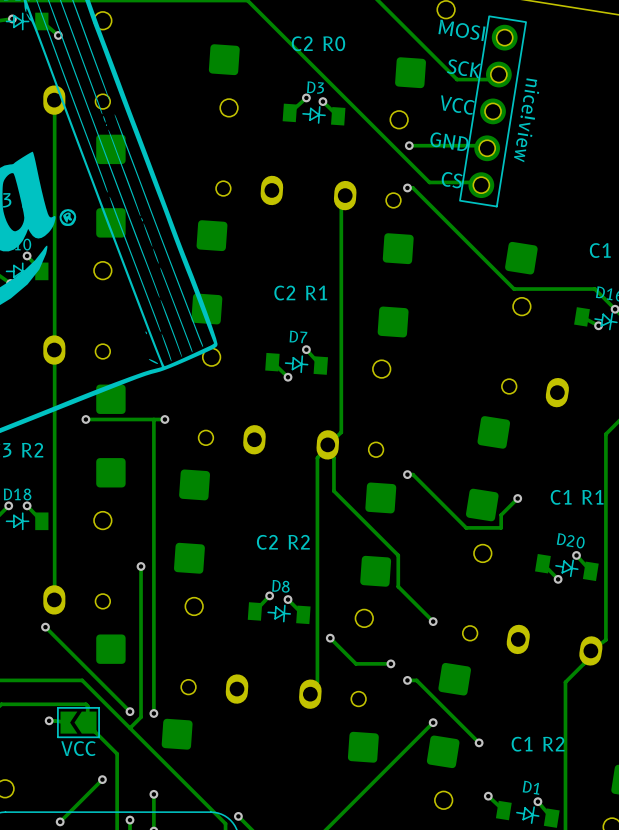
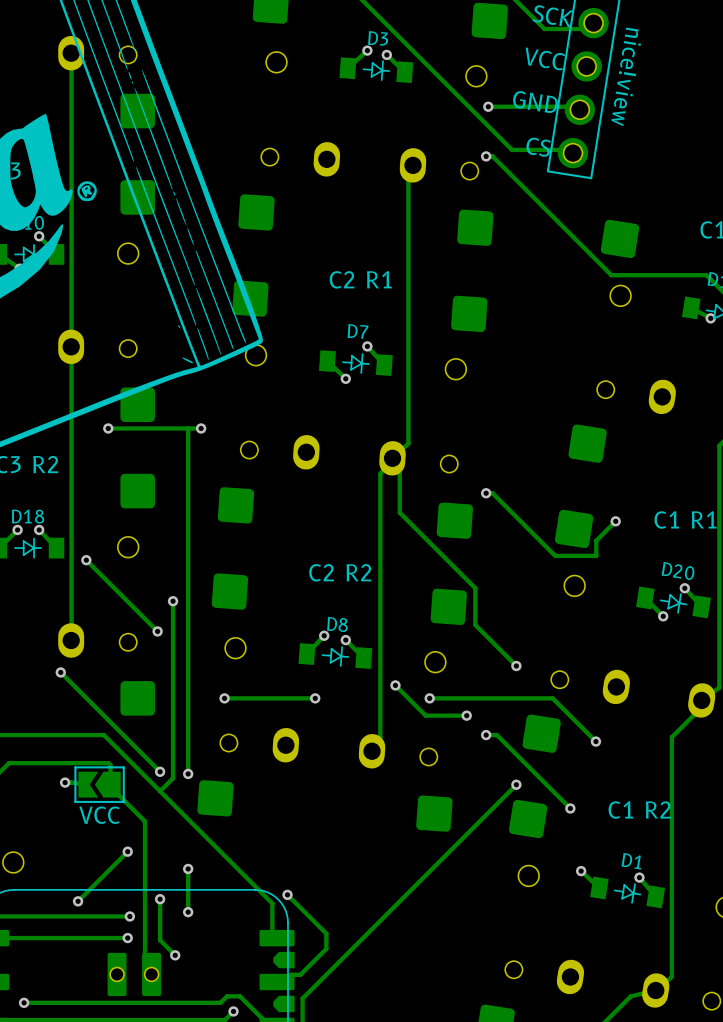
track: none -> (86, 560) (157, 631)
via: none -> (86, 560)
via: none -> (157, 631)
via: none -> (224, 698)
track: none -> (315, 698) (224, 698)
via: none -> (315, 698)
track: none -> (429, 698) (552, 698) (595, 741)
via: none -> (429, 698)
via: none -> (595, 741)

